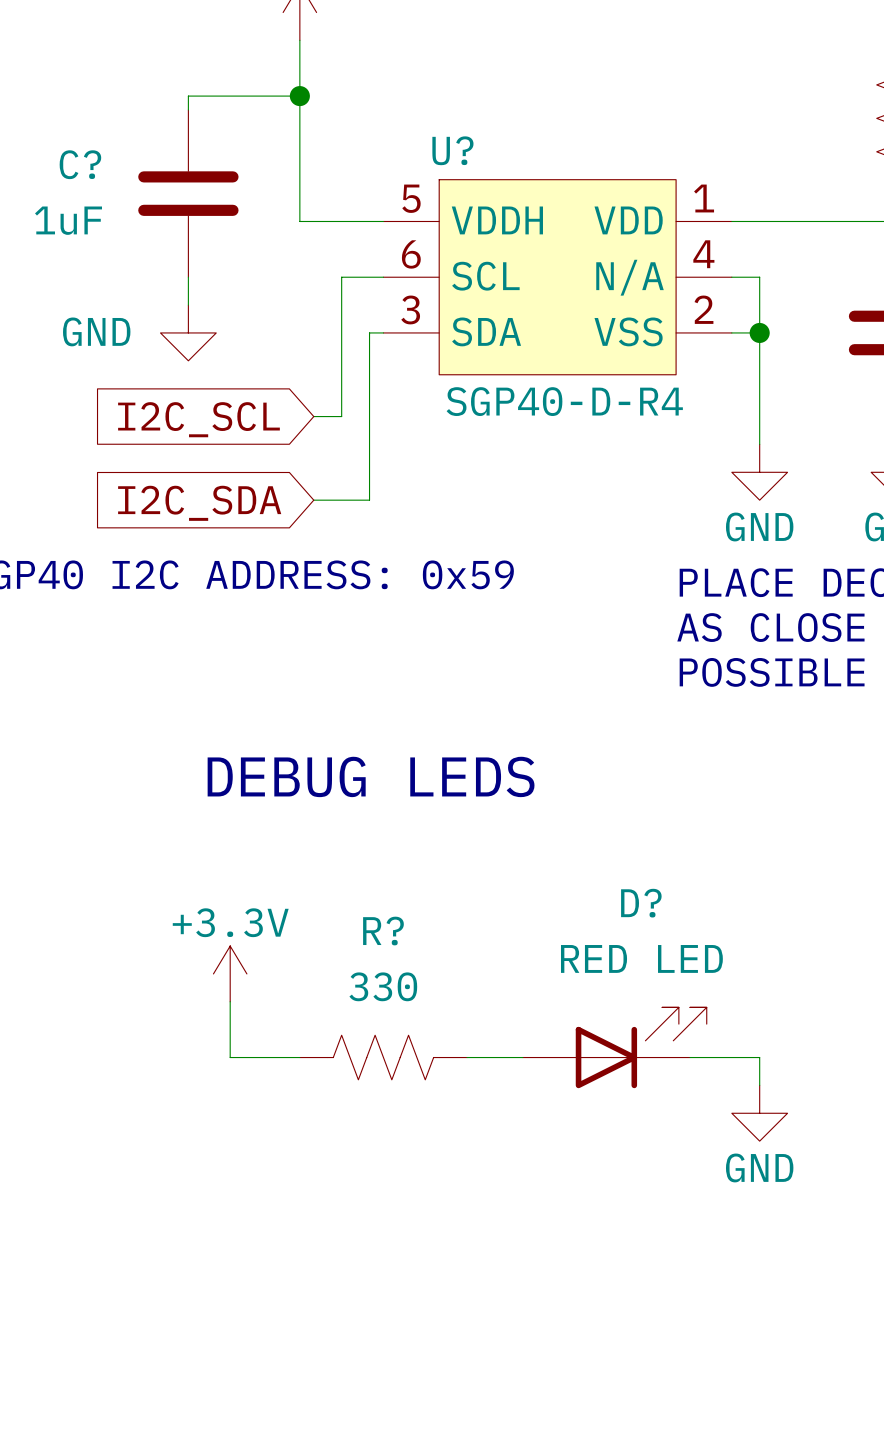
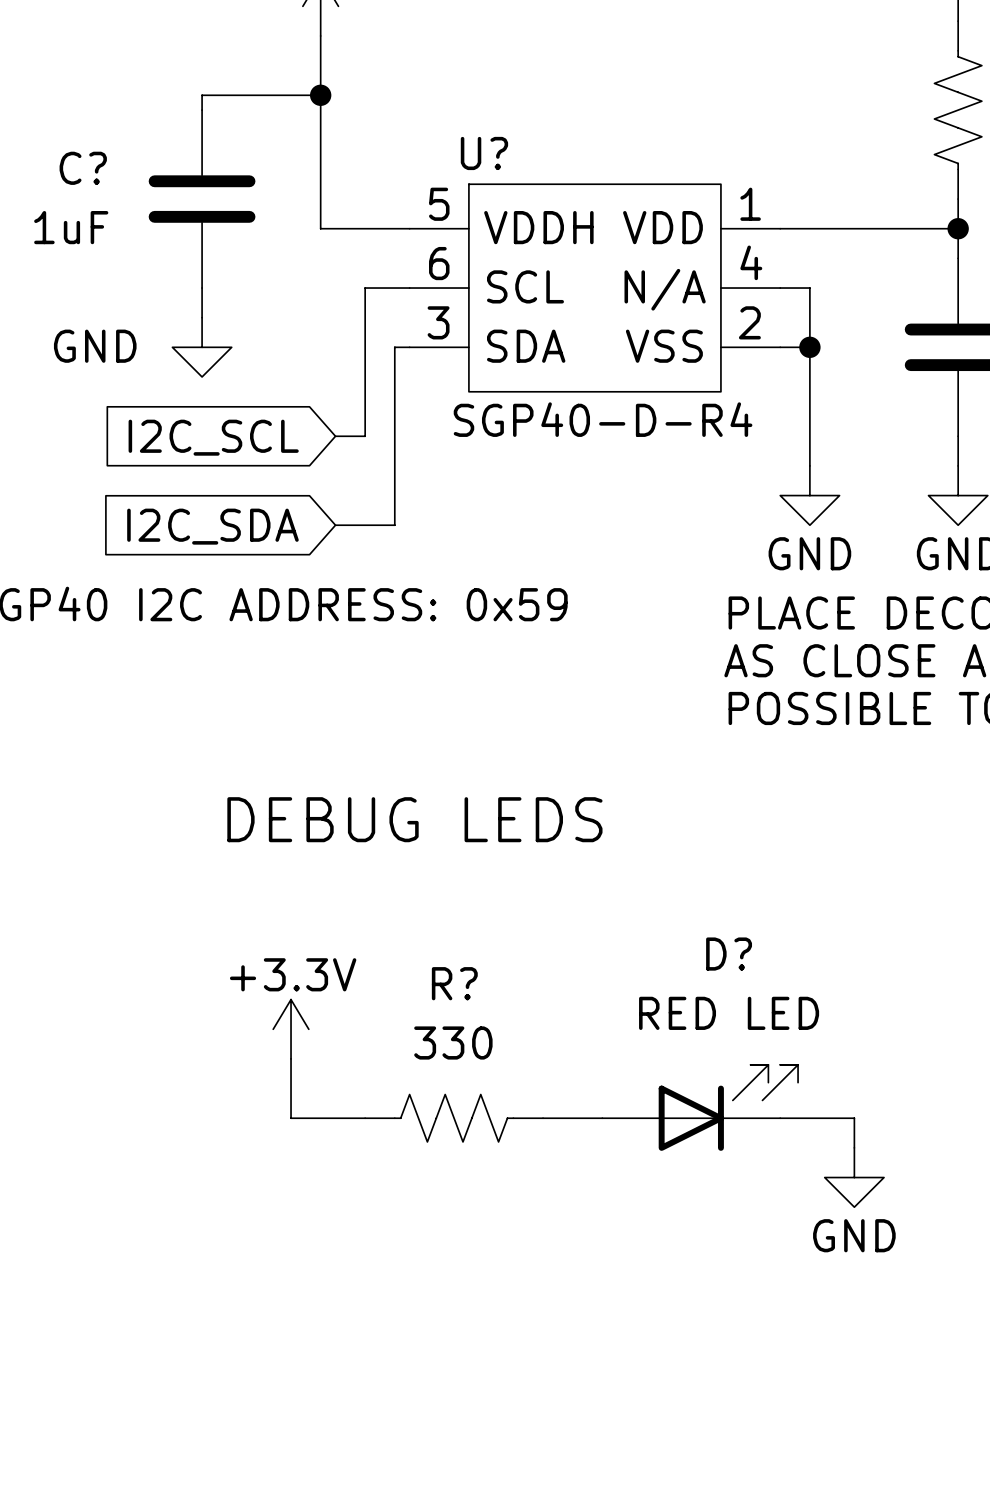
power symbol position: +3.3V (230, 973) -> +3.3V (291, 1029)
wire: (230, 1001) (230, 1057) (271, 1057) -> (291, 1058) (291, 1118)
D? position: (614, 1047) -> (700, 1107)
R? position: (383, 1057) -> (454, 1118)
wire: (759, 1057) (759, 1085) -> (809, 1118) (854, 1118) (854, 1147)
power symbol position: GND (759, 1113) -> GND (854, 1177)

